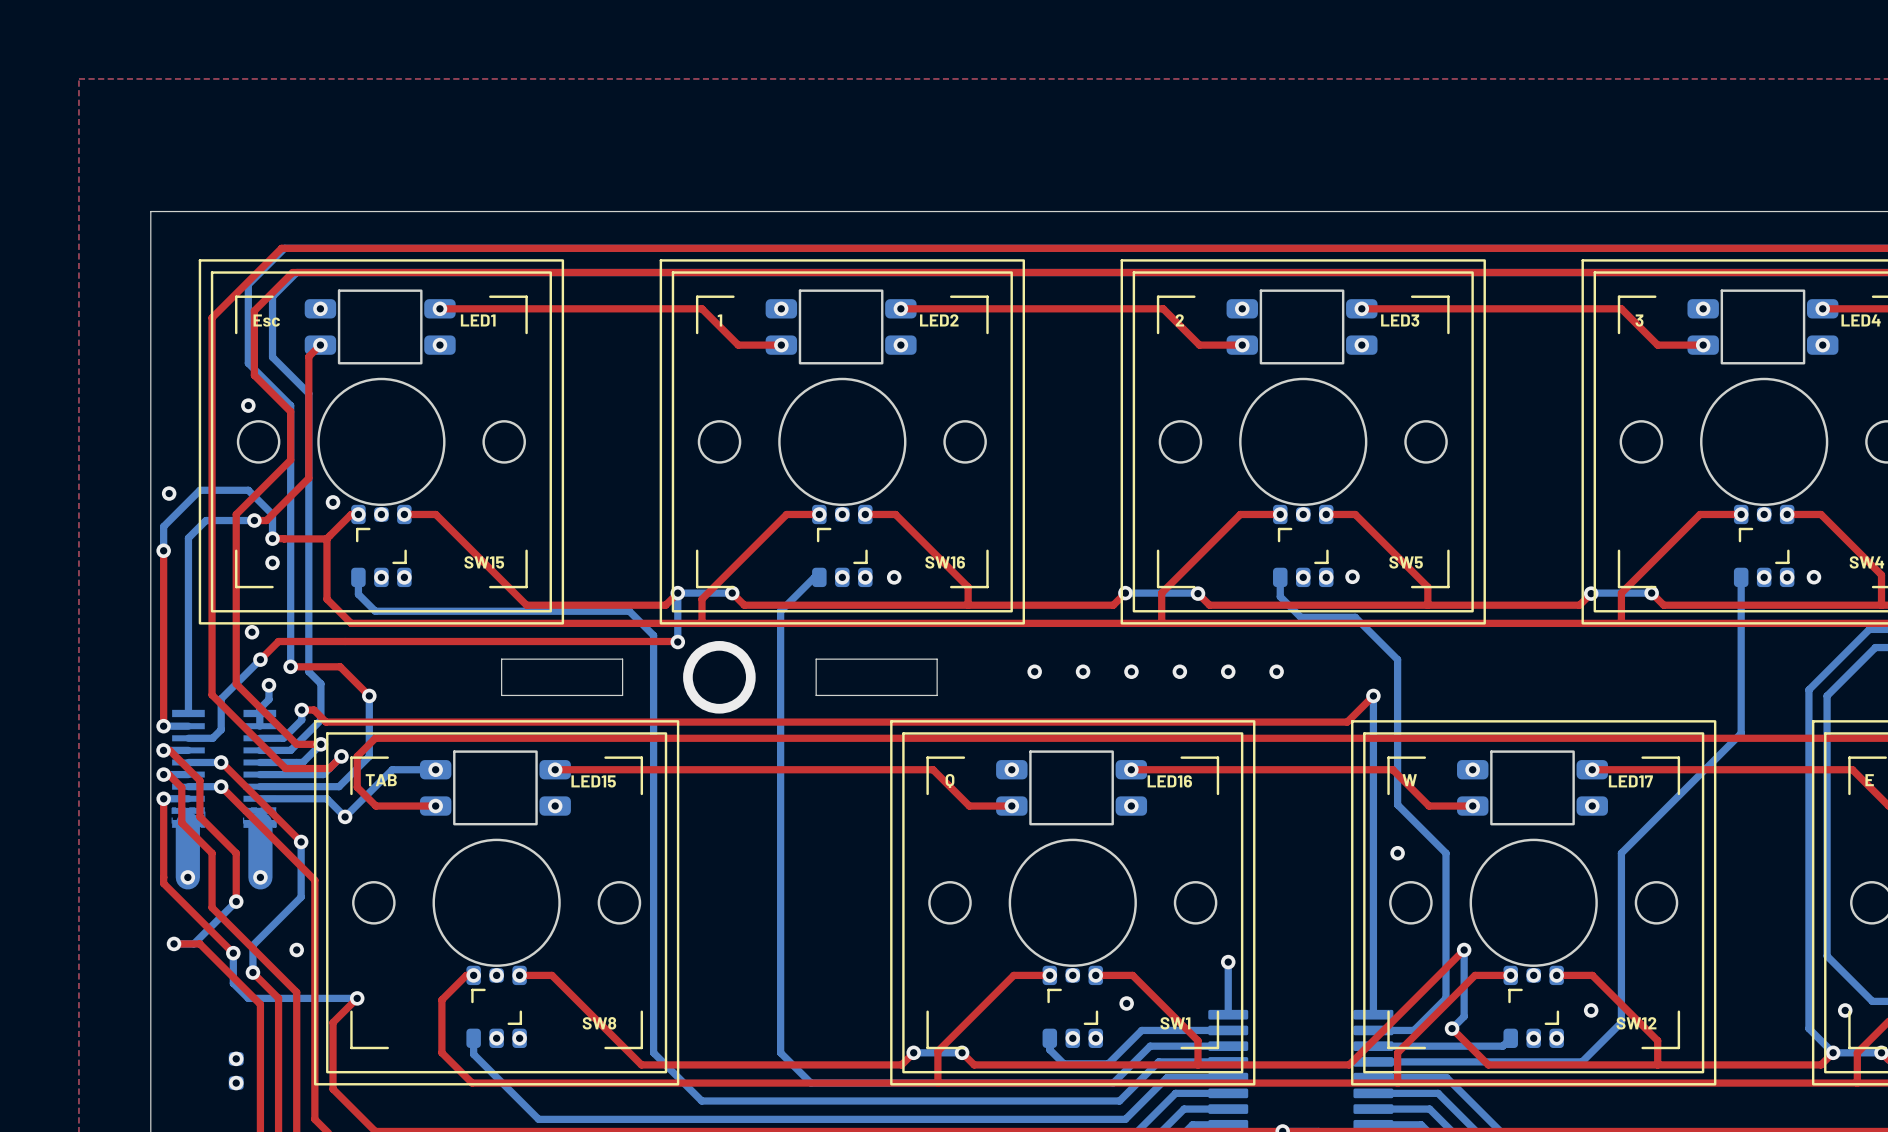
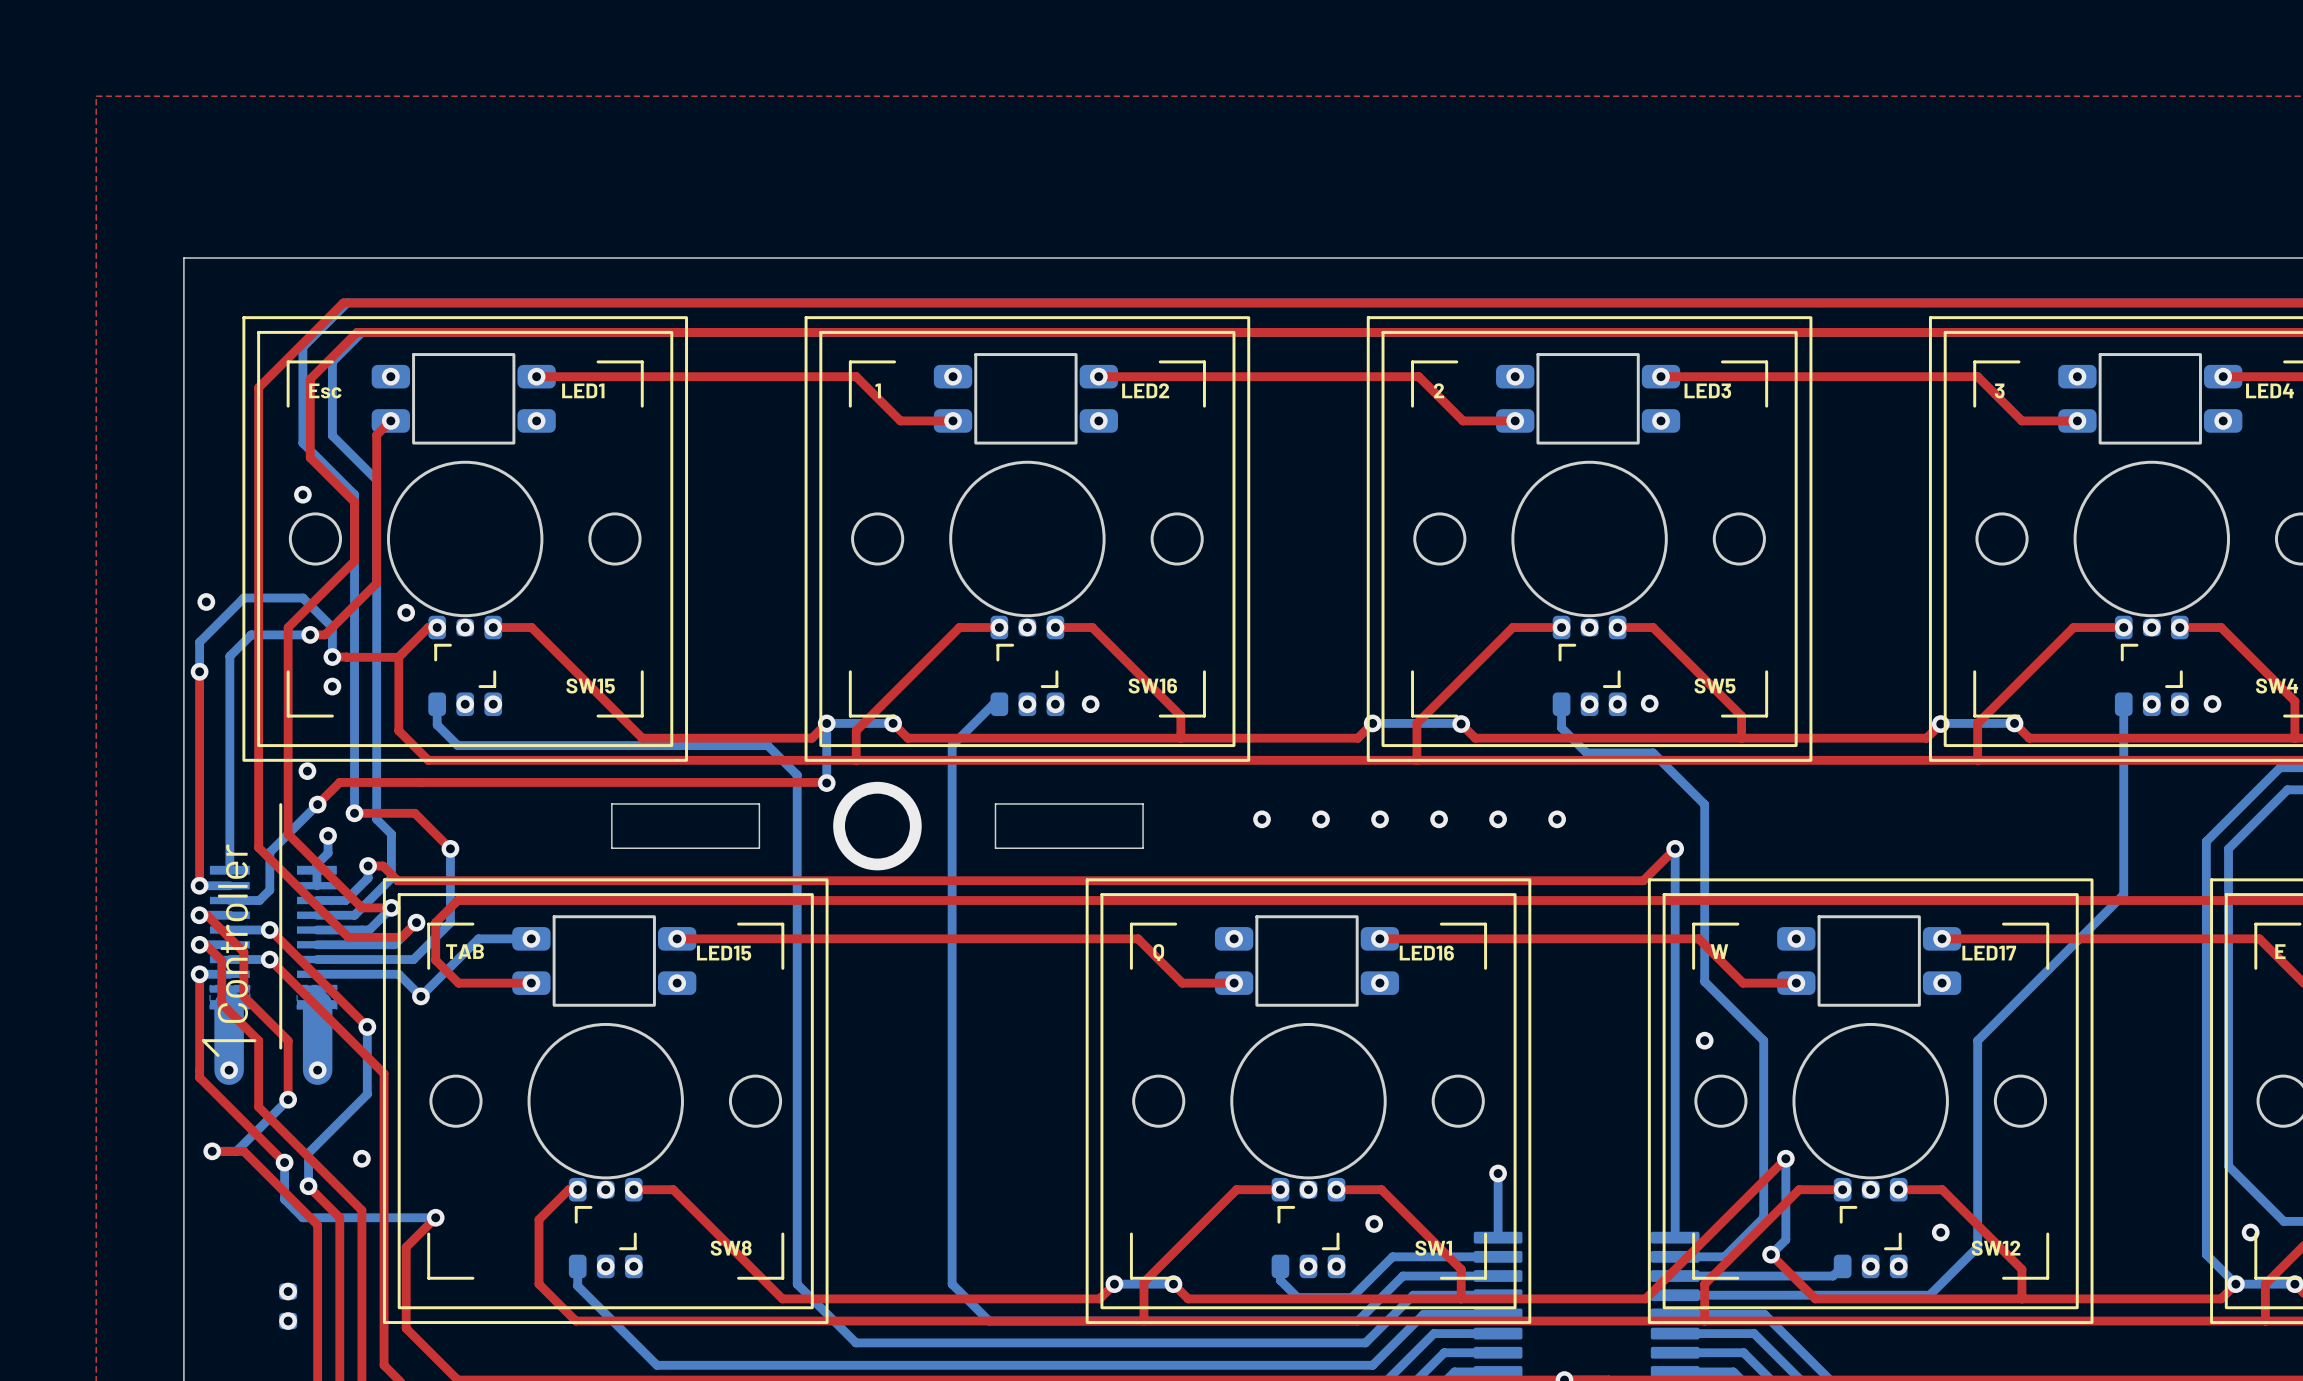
line: none -> (280, 804) (280, 1048)
text: none -> Controller (232, 933)
line: none -> (254, 1040) (203, 1040) (218, 1055)

